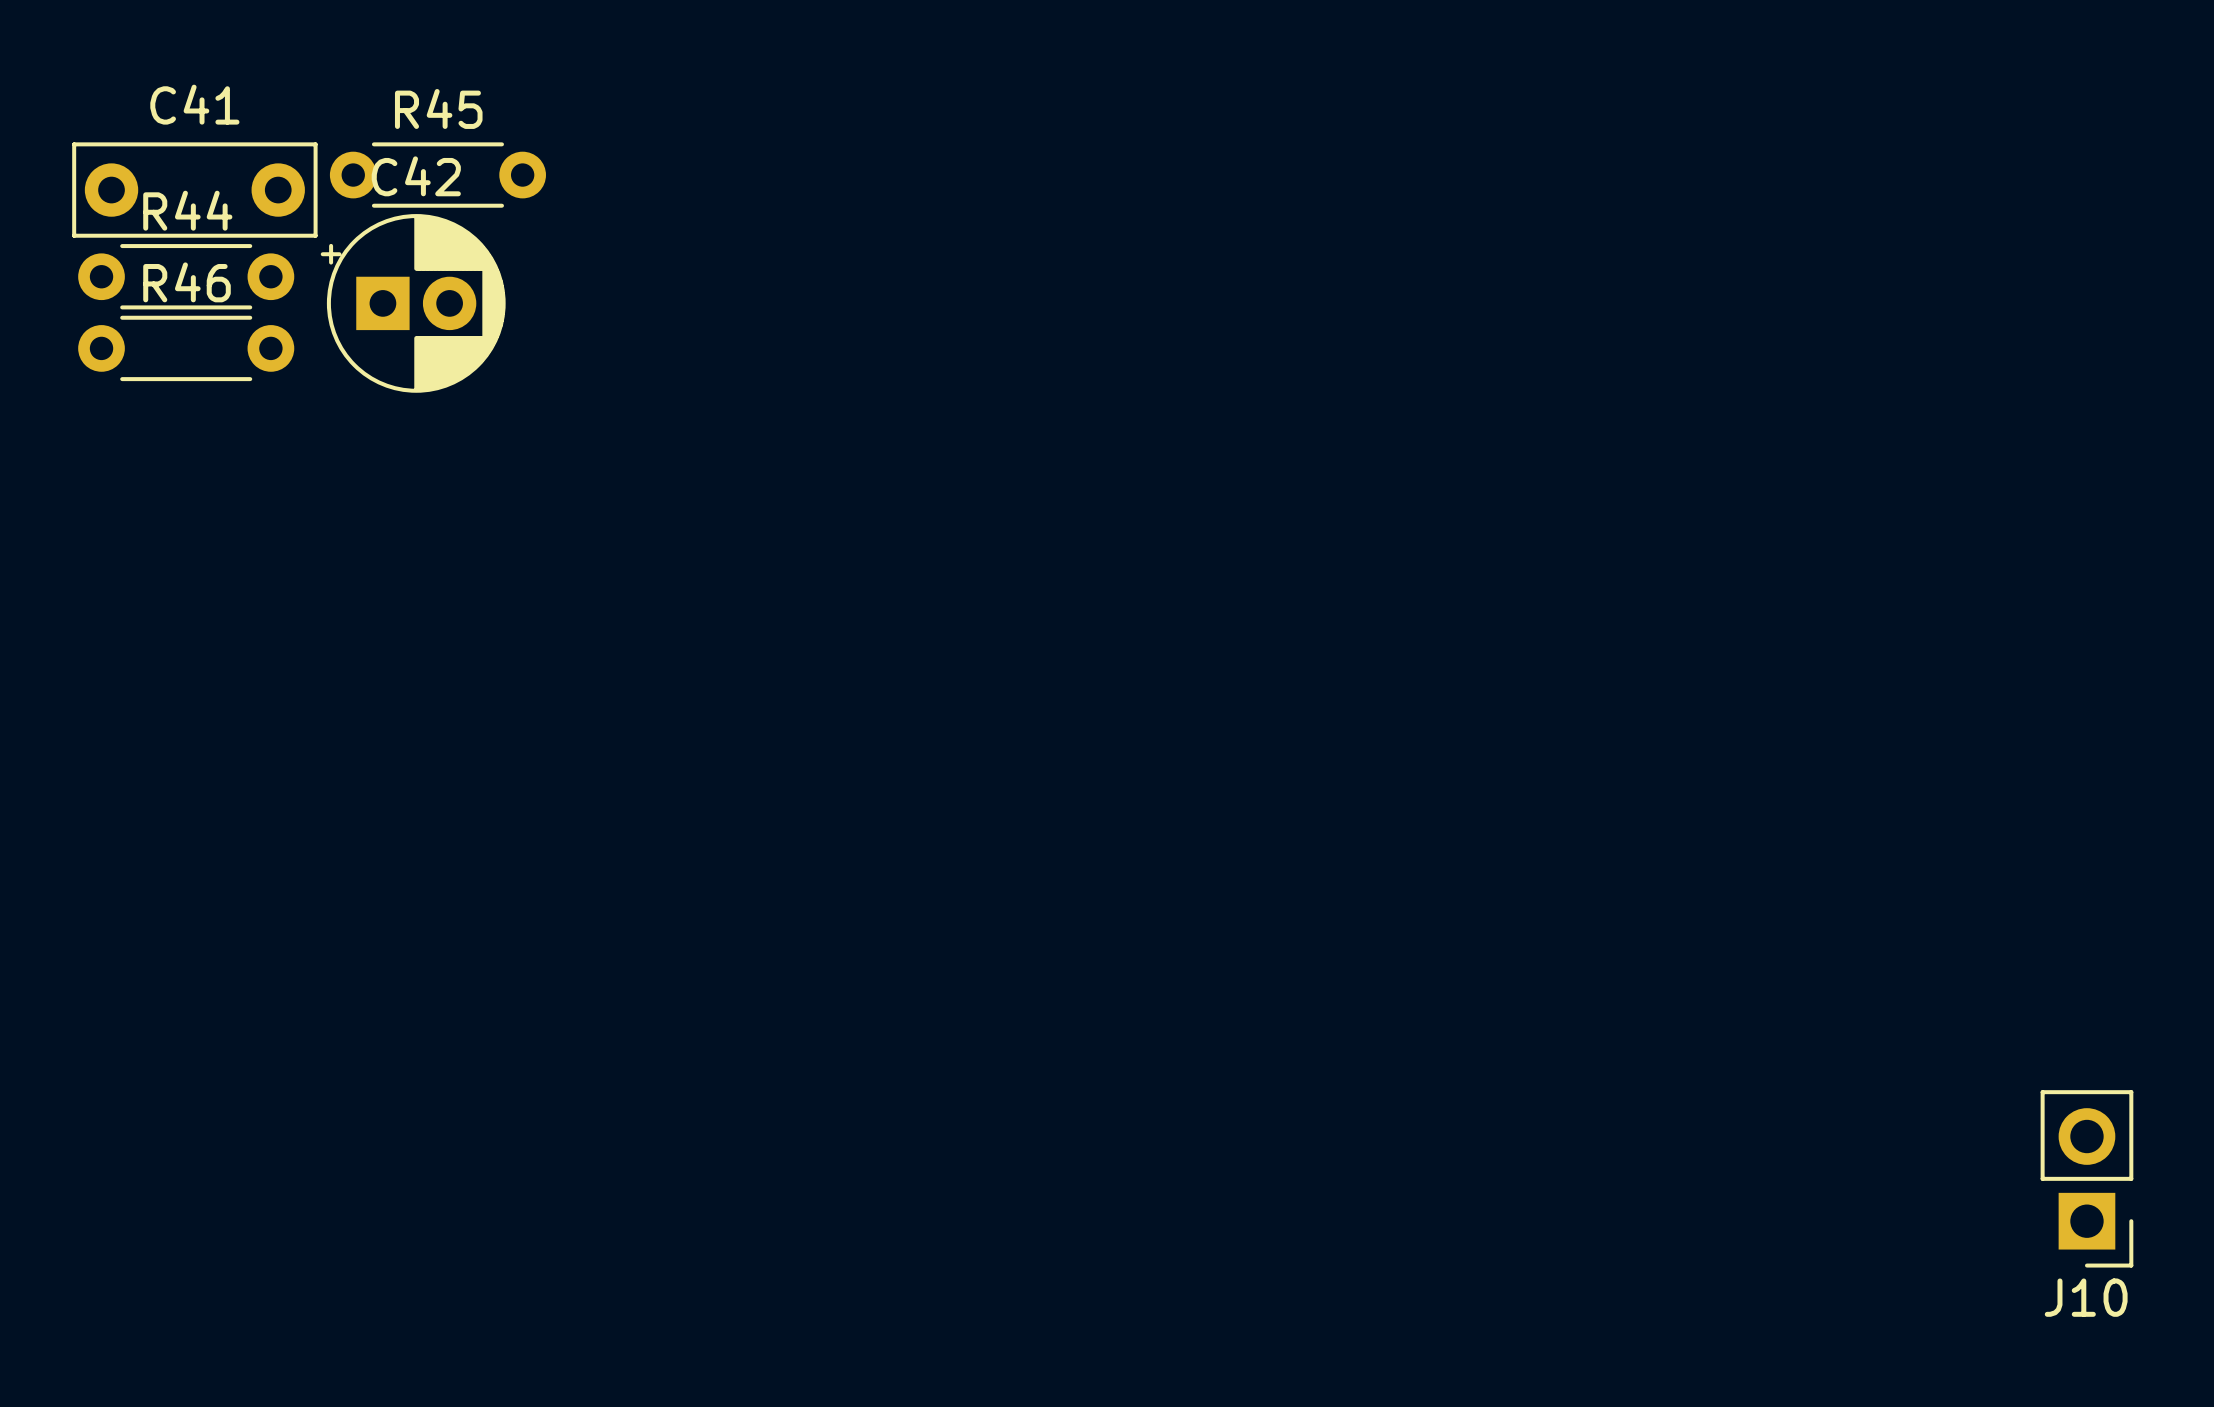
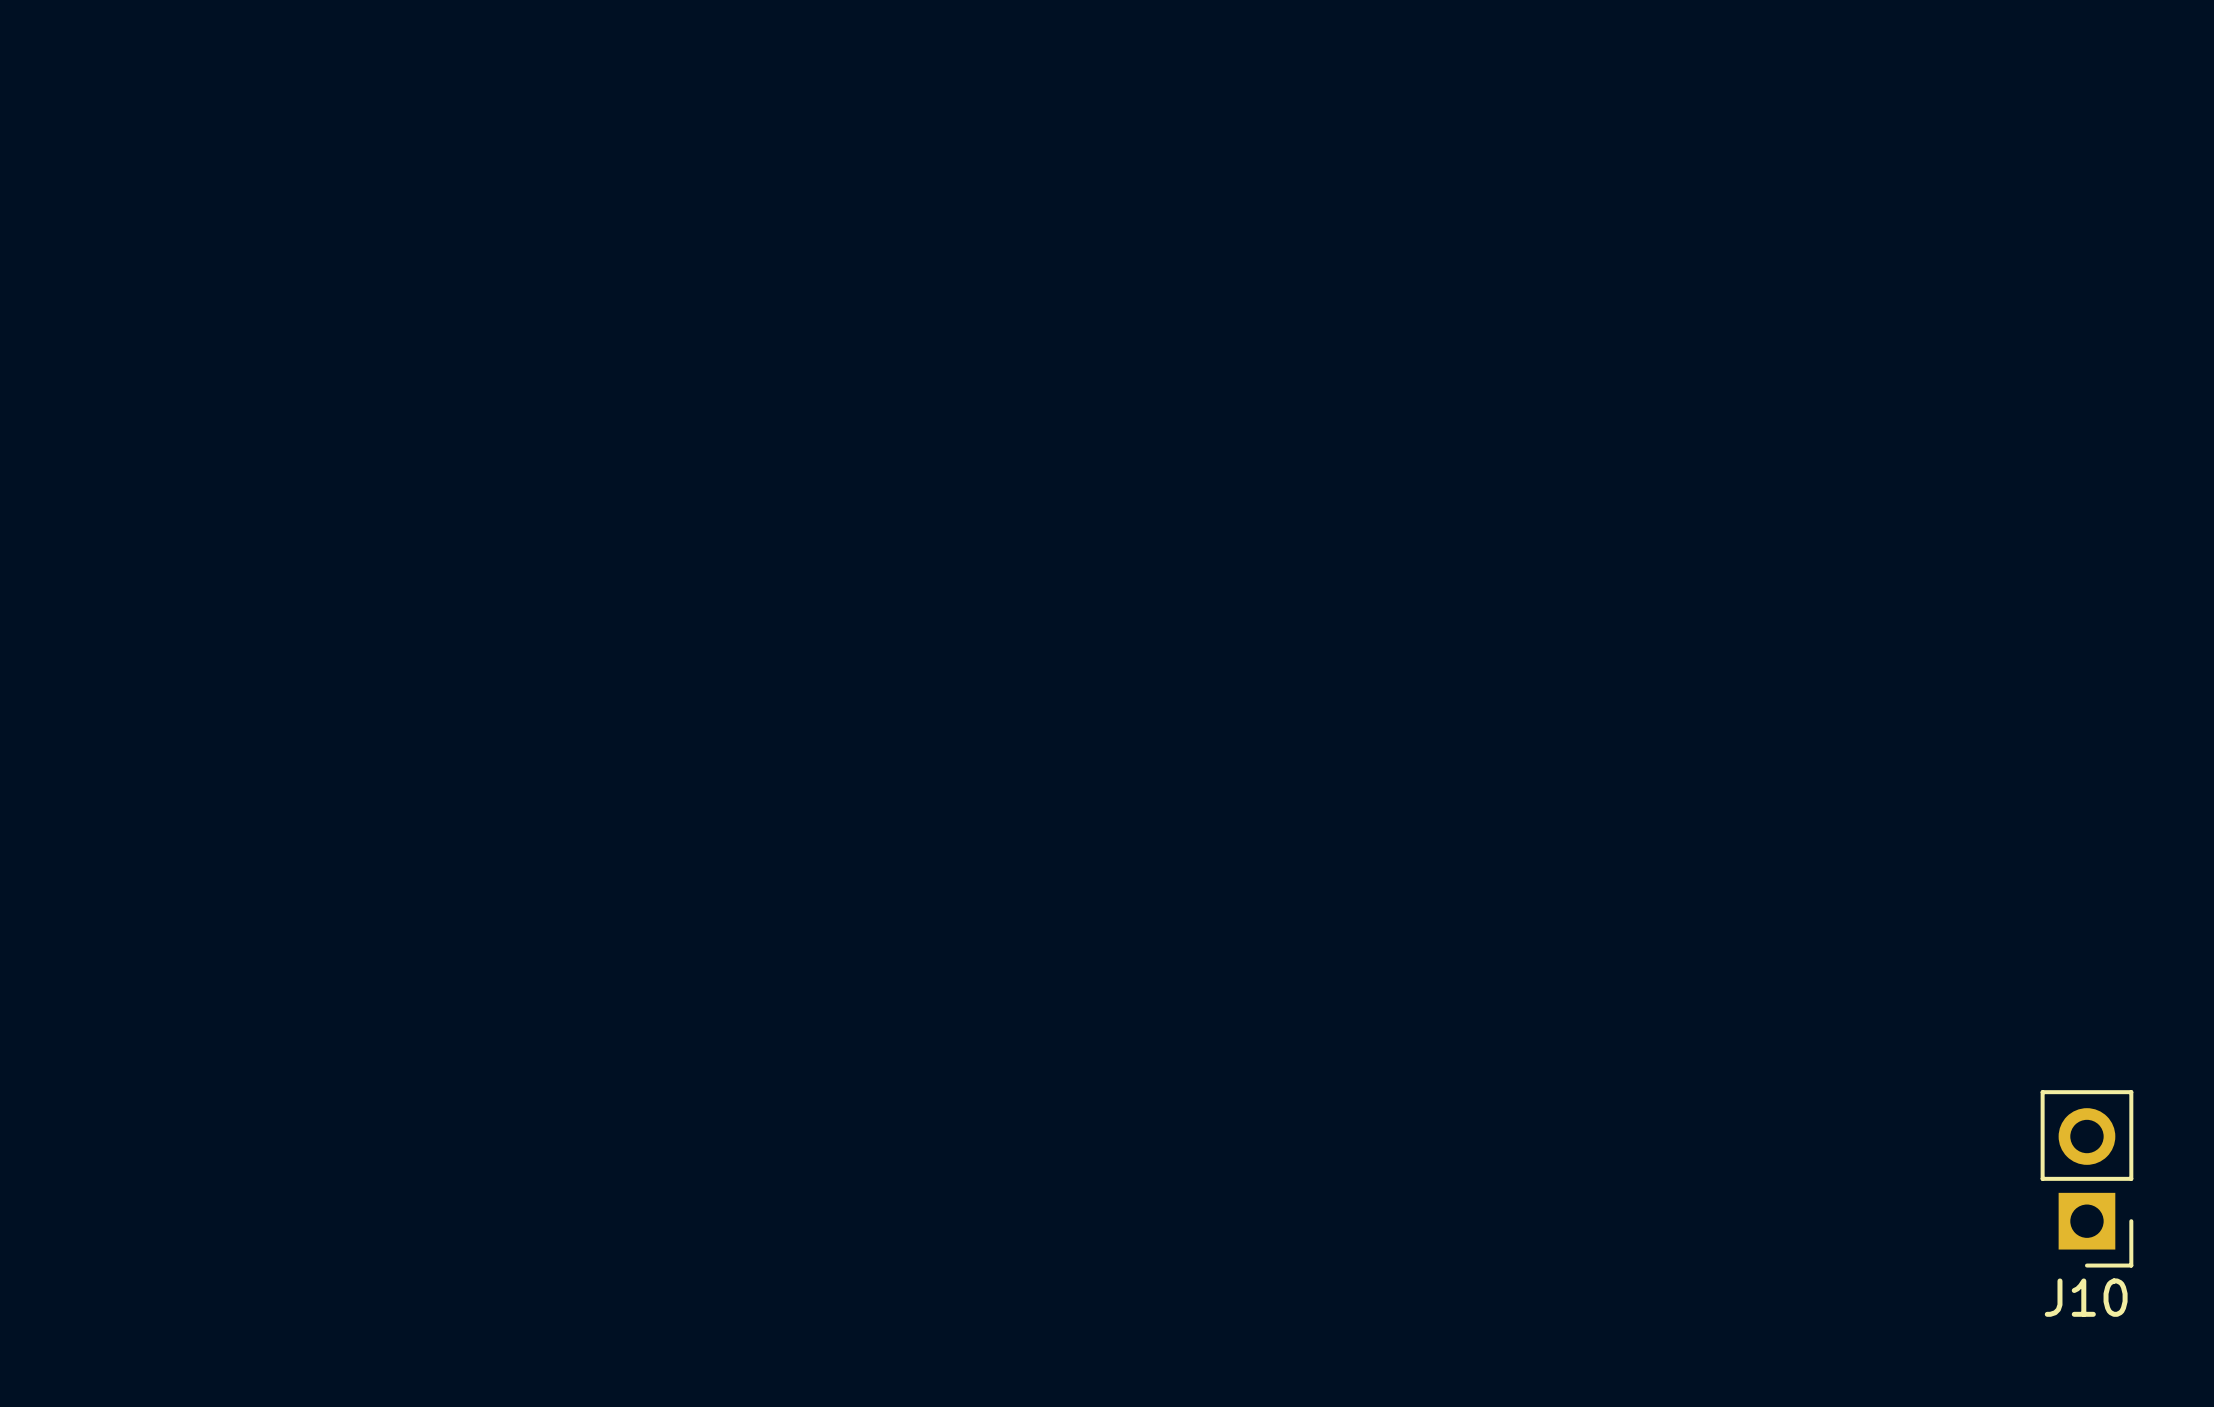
R45: (437, 175) -> none
C41: (194, 190) -> none
R44: (186, 276) -> none
C42: (413, 303) -> none
R46: (186, 348) -> none

